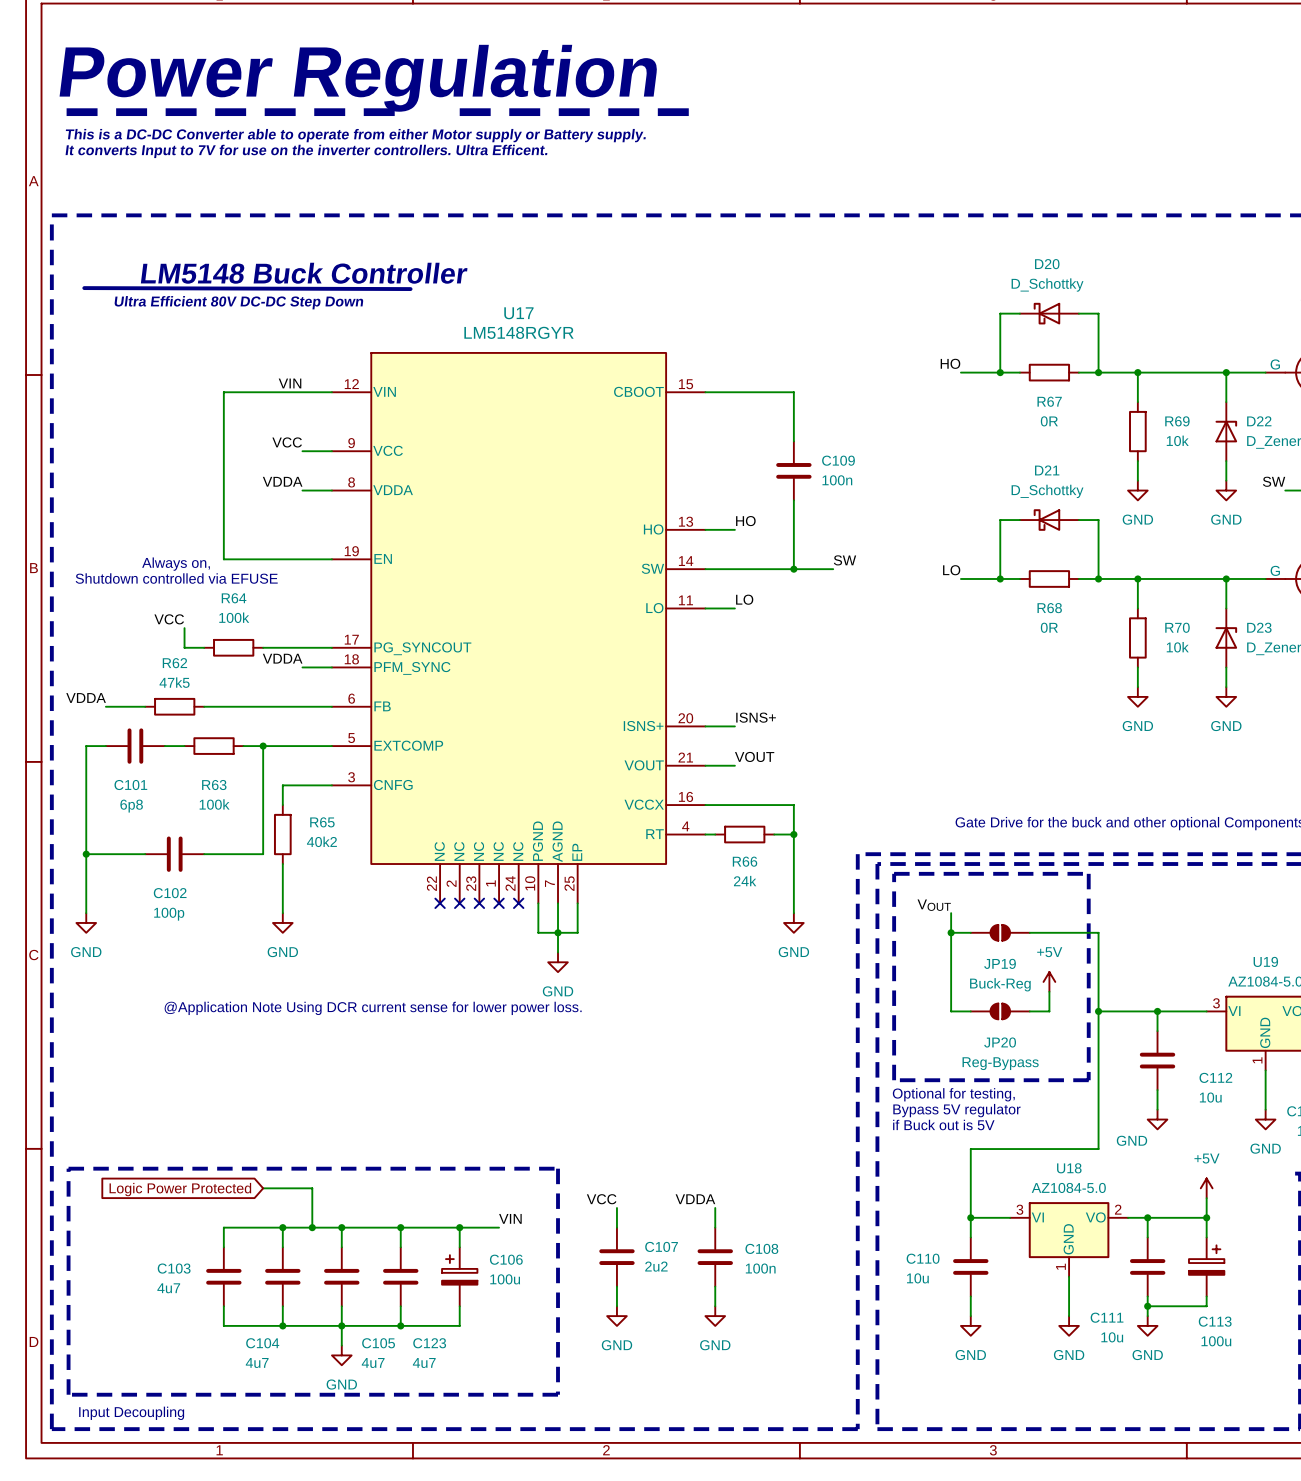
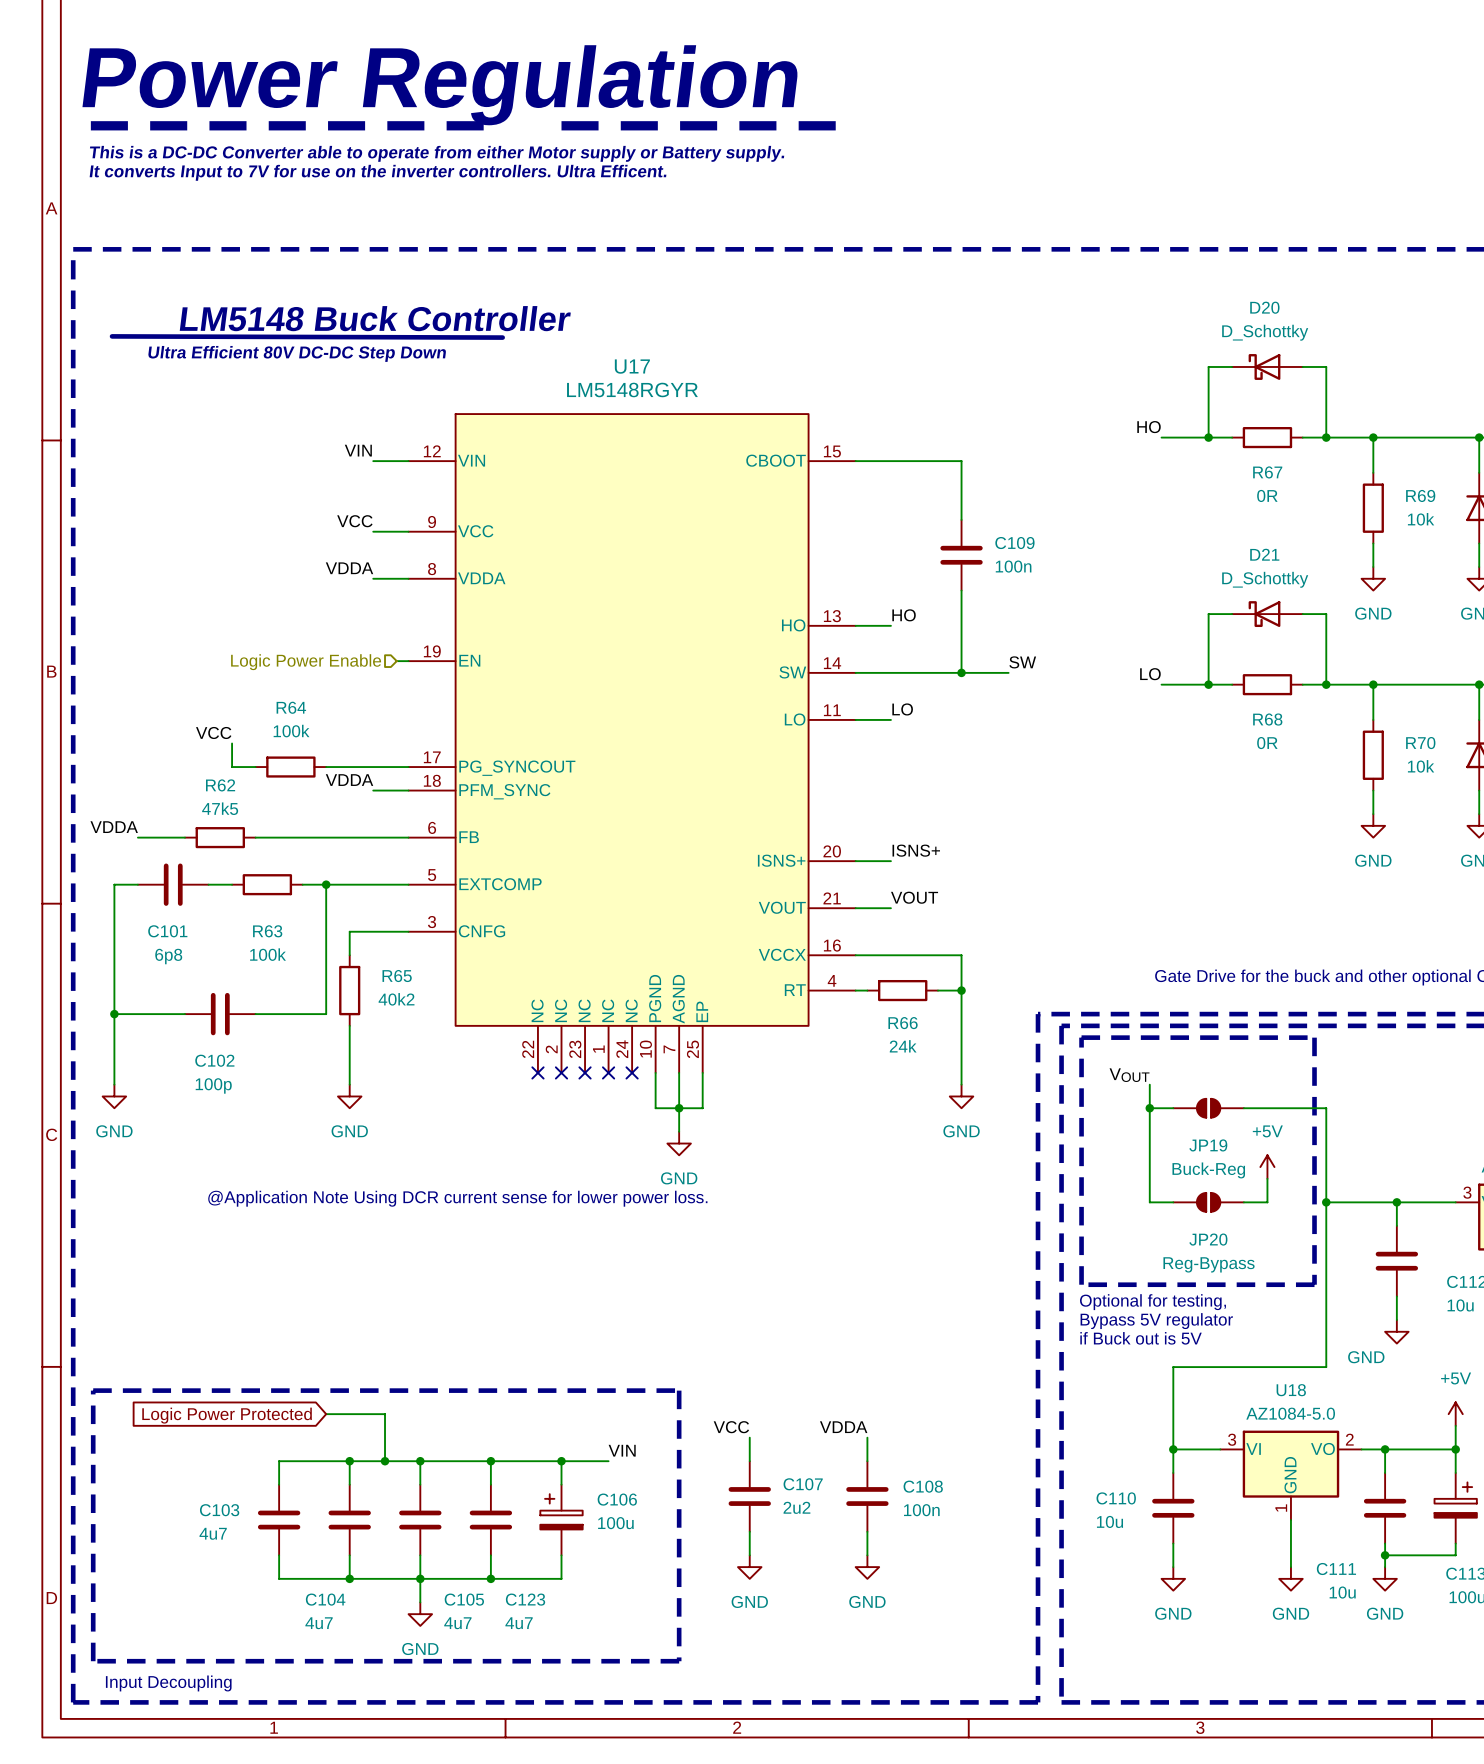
wire: (302, 392) (223, 392) (223, 559) (322, 559) -> none
hierarchical label: none -> Logic Power Enable (306, 662)
text: Always on, (176, 564) -> none
text: Shutdown controlled via EFUSE (176, 578) -> none

